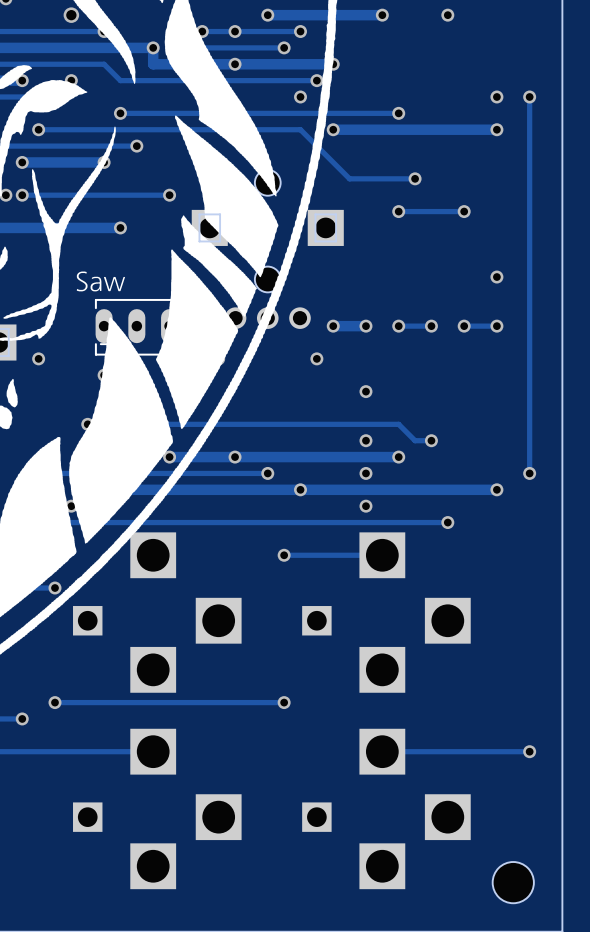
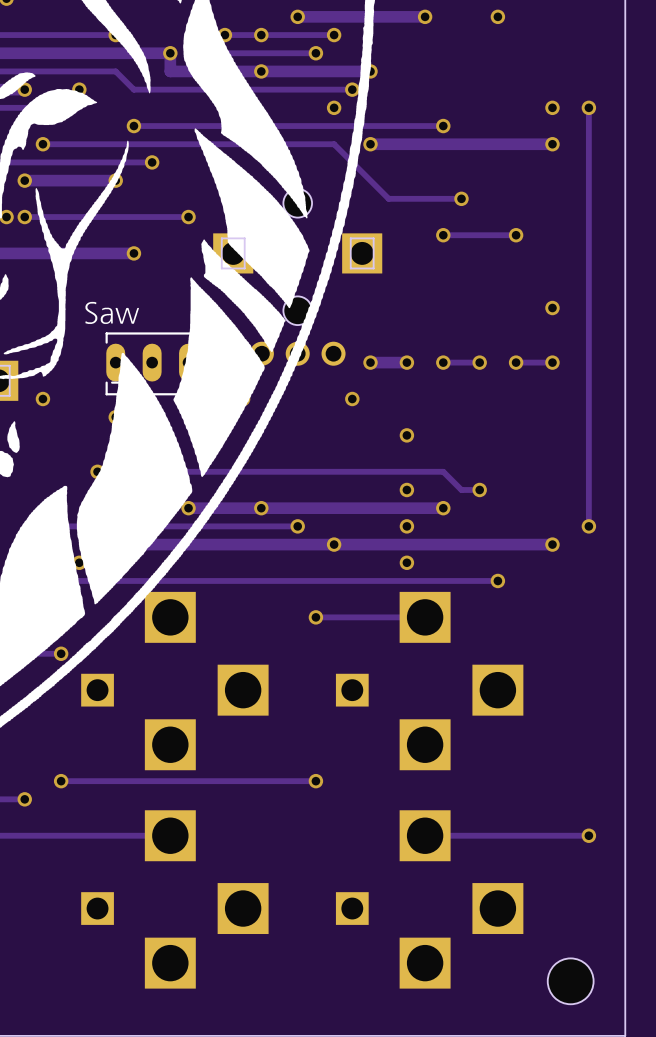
via: (71, 15) -> none

